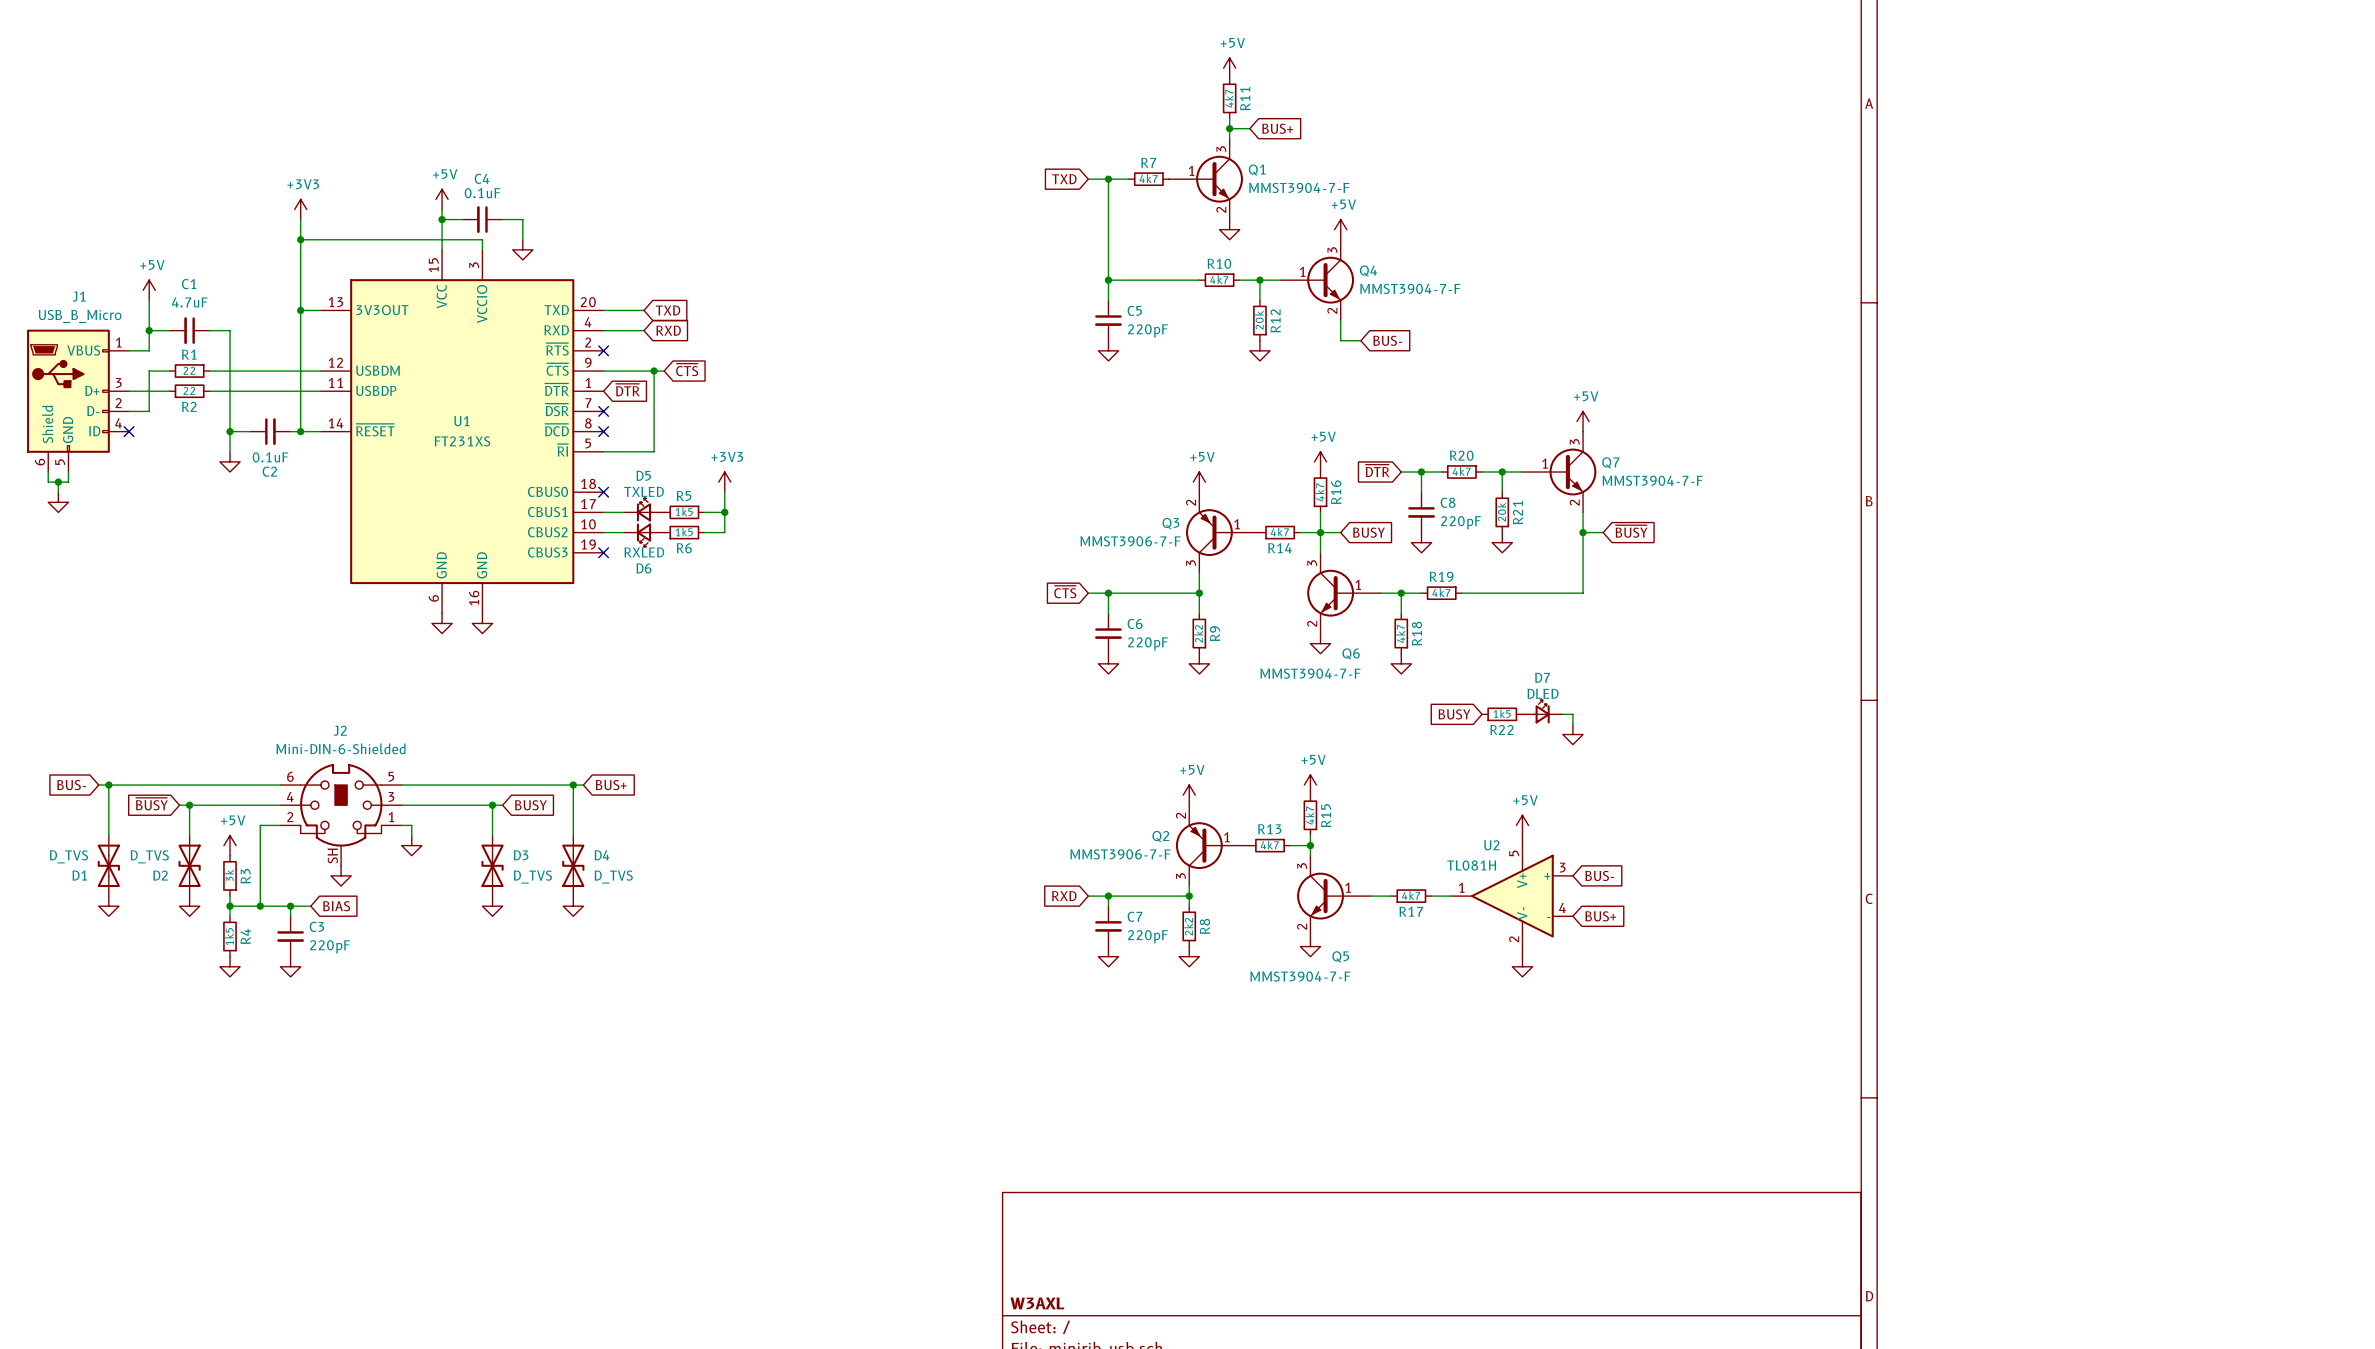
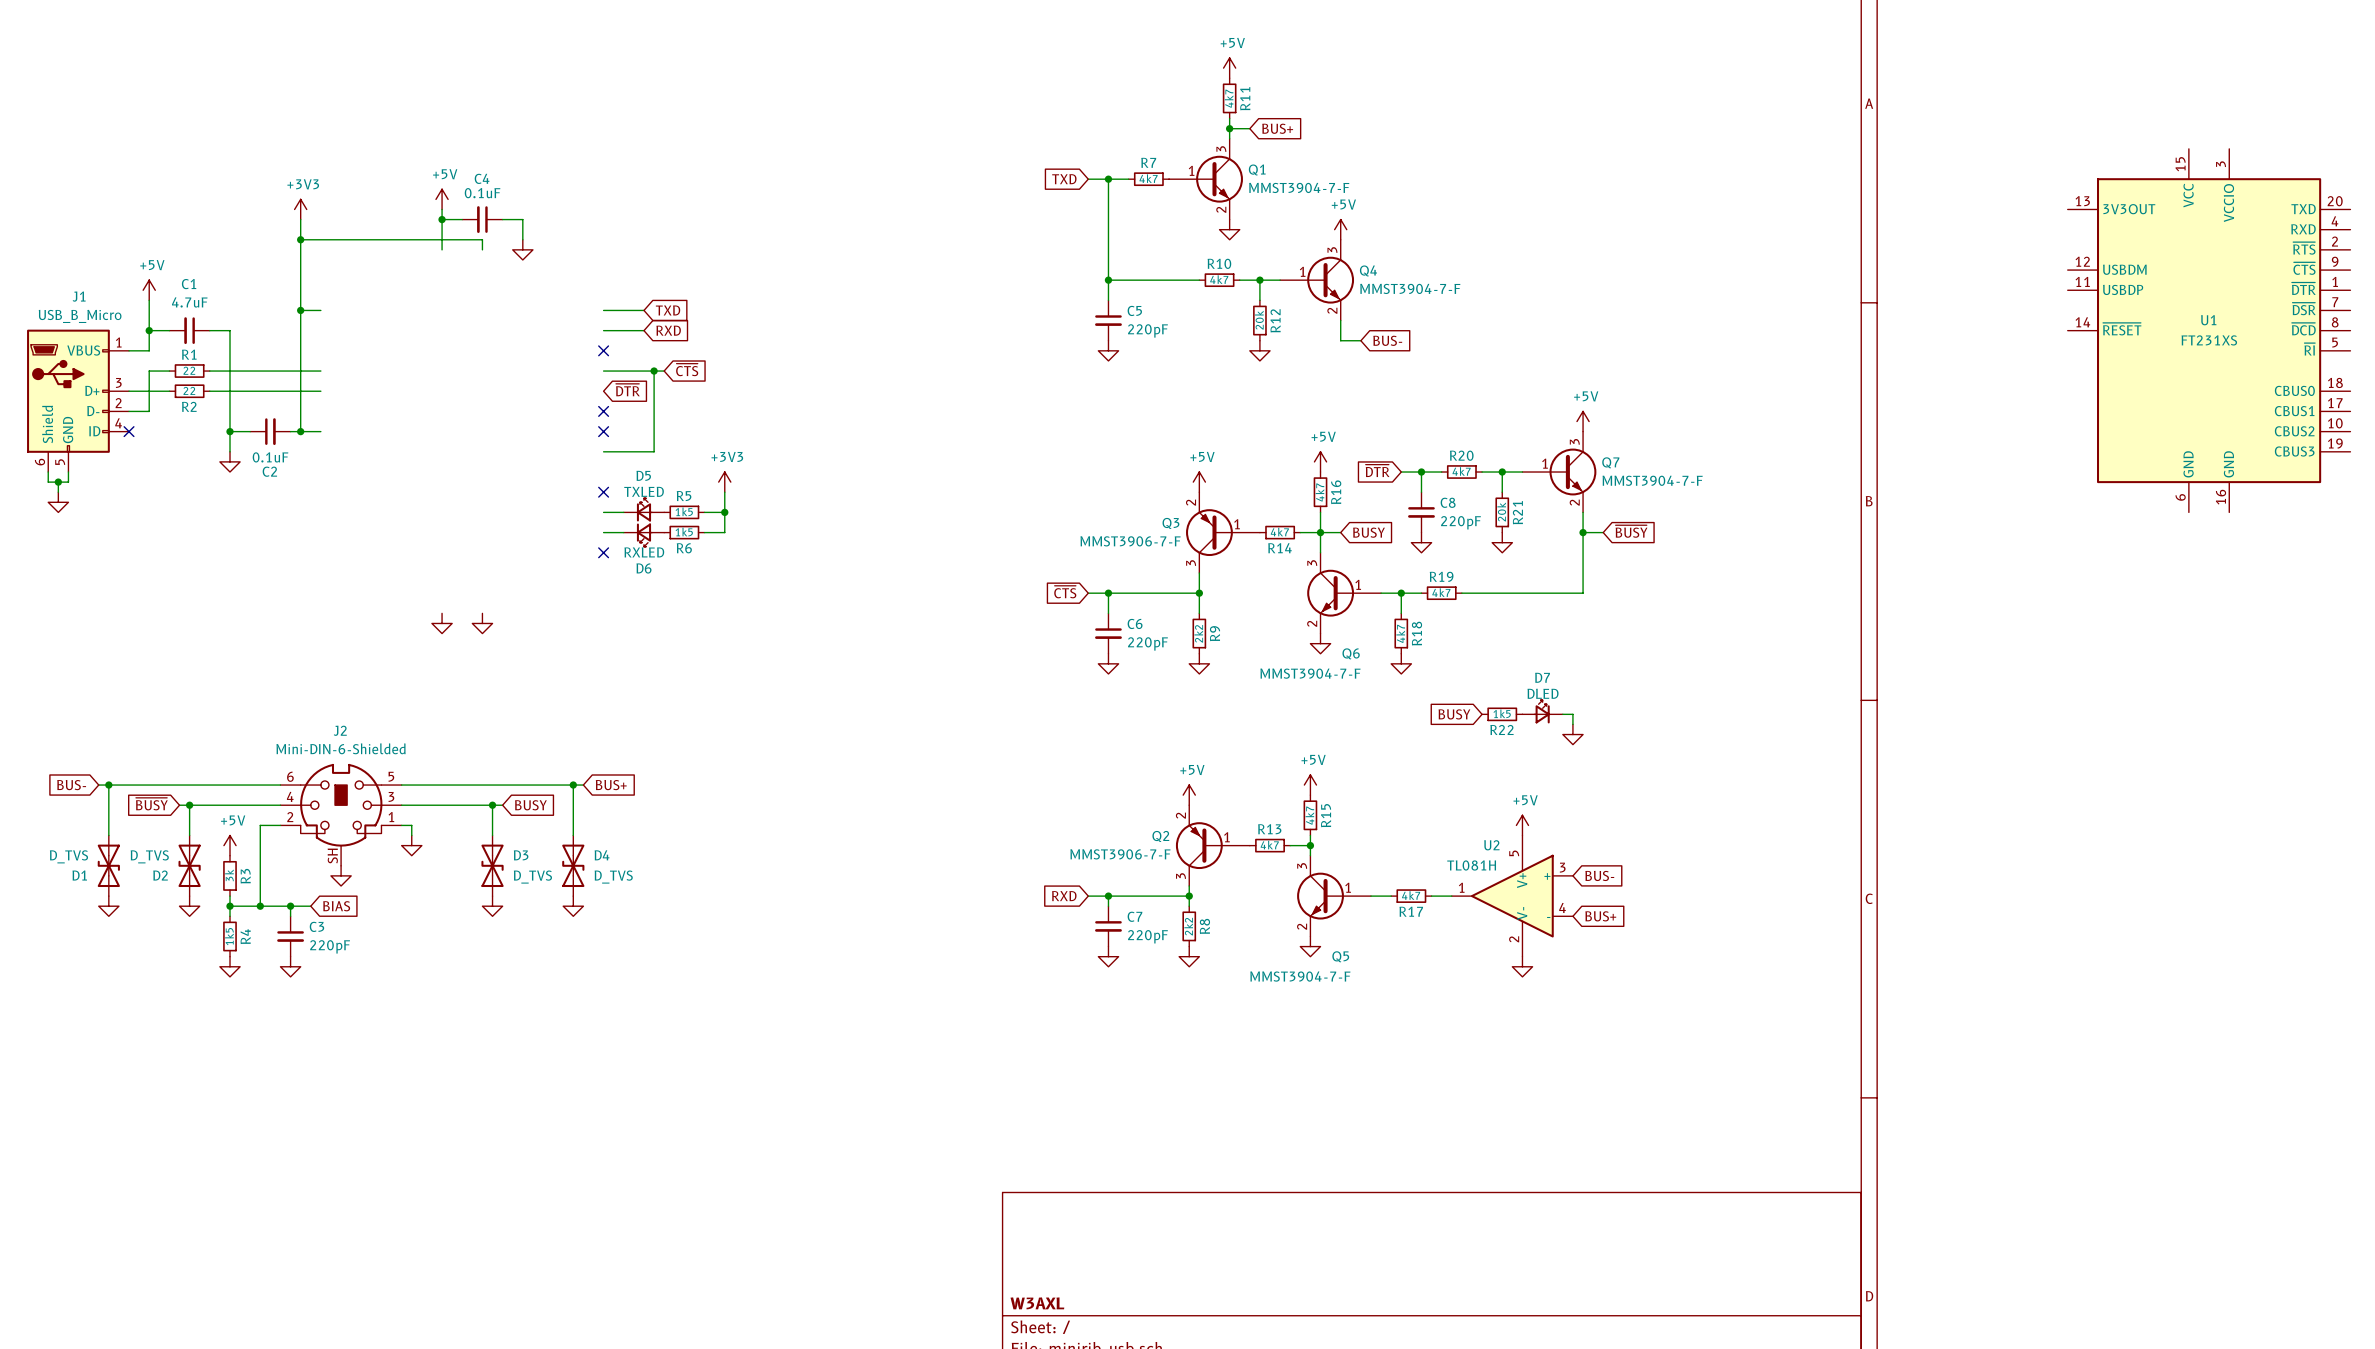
U1 position: (462, 431) -> (2209, 330)

